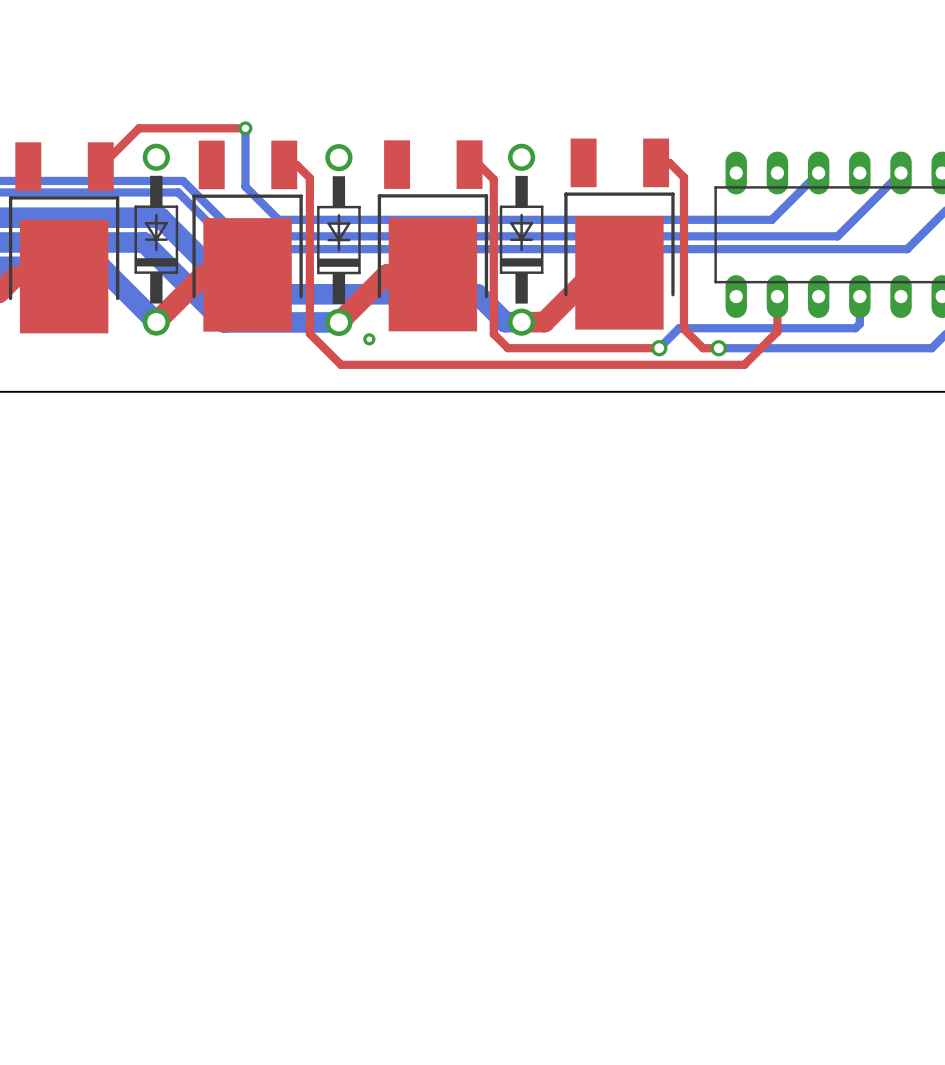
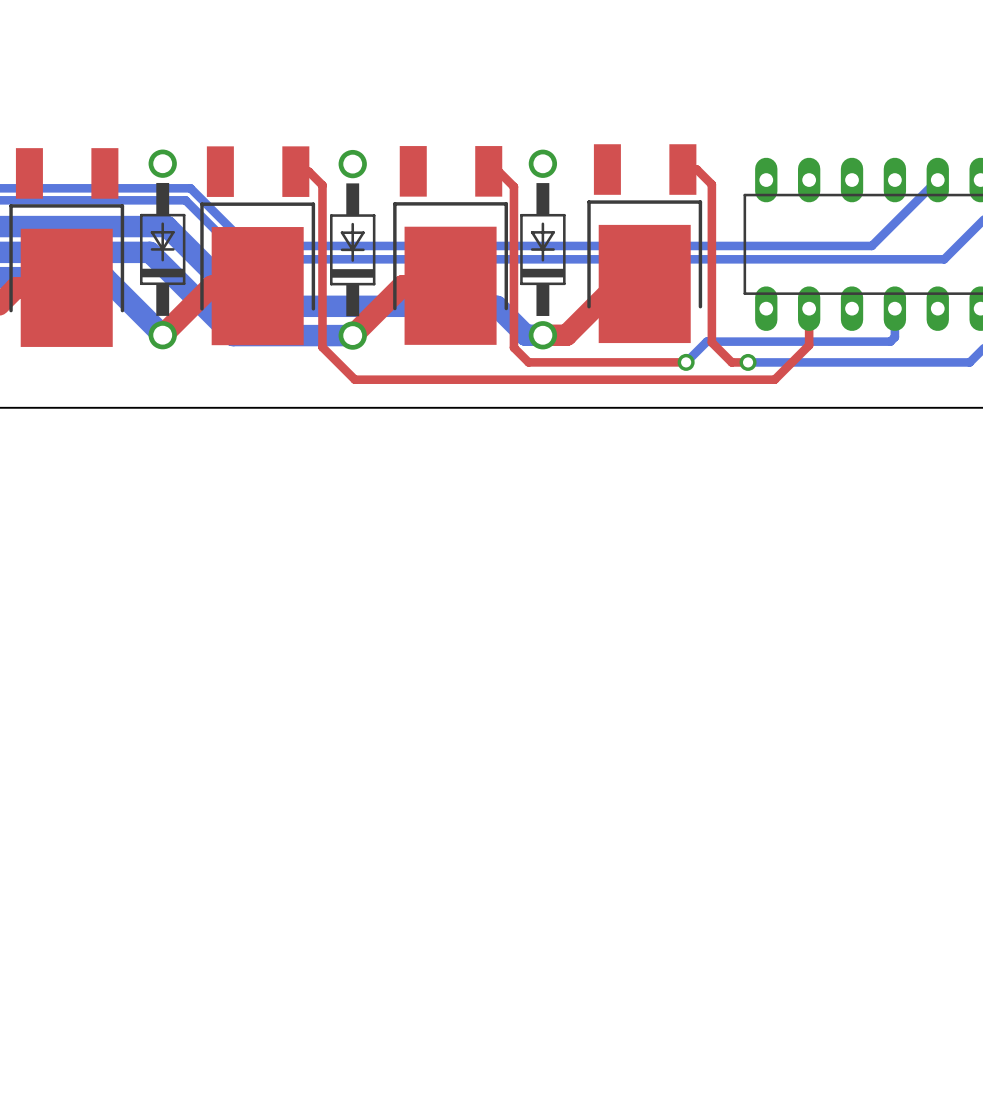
top track: (245, 128) (139, 128) (100, 166) -> none
bottom track: (245, 128) (245, 186) (278, 219) (771, 219) (818, 172) -> none
via: (245, 128) -> none
via: (369, 339) -> none

